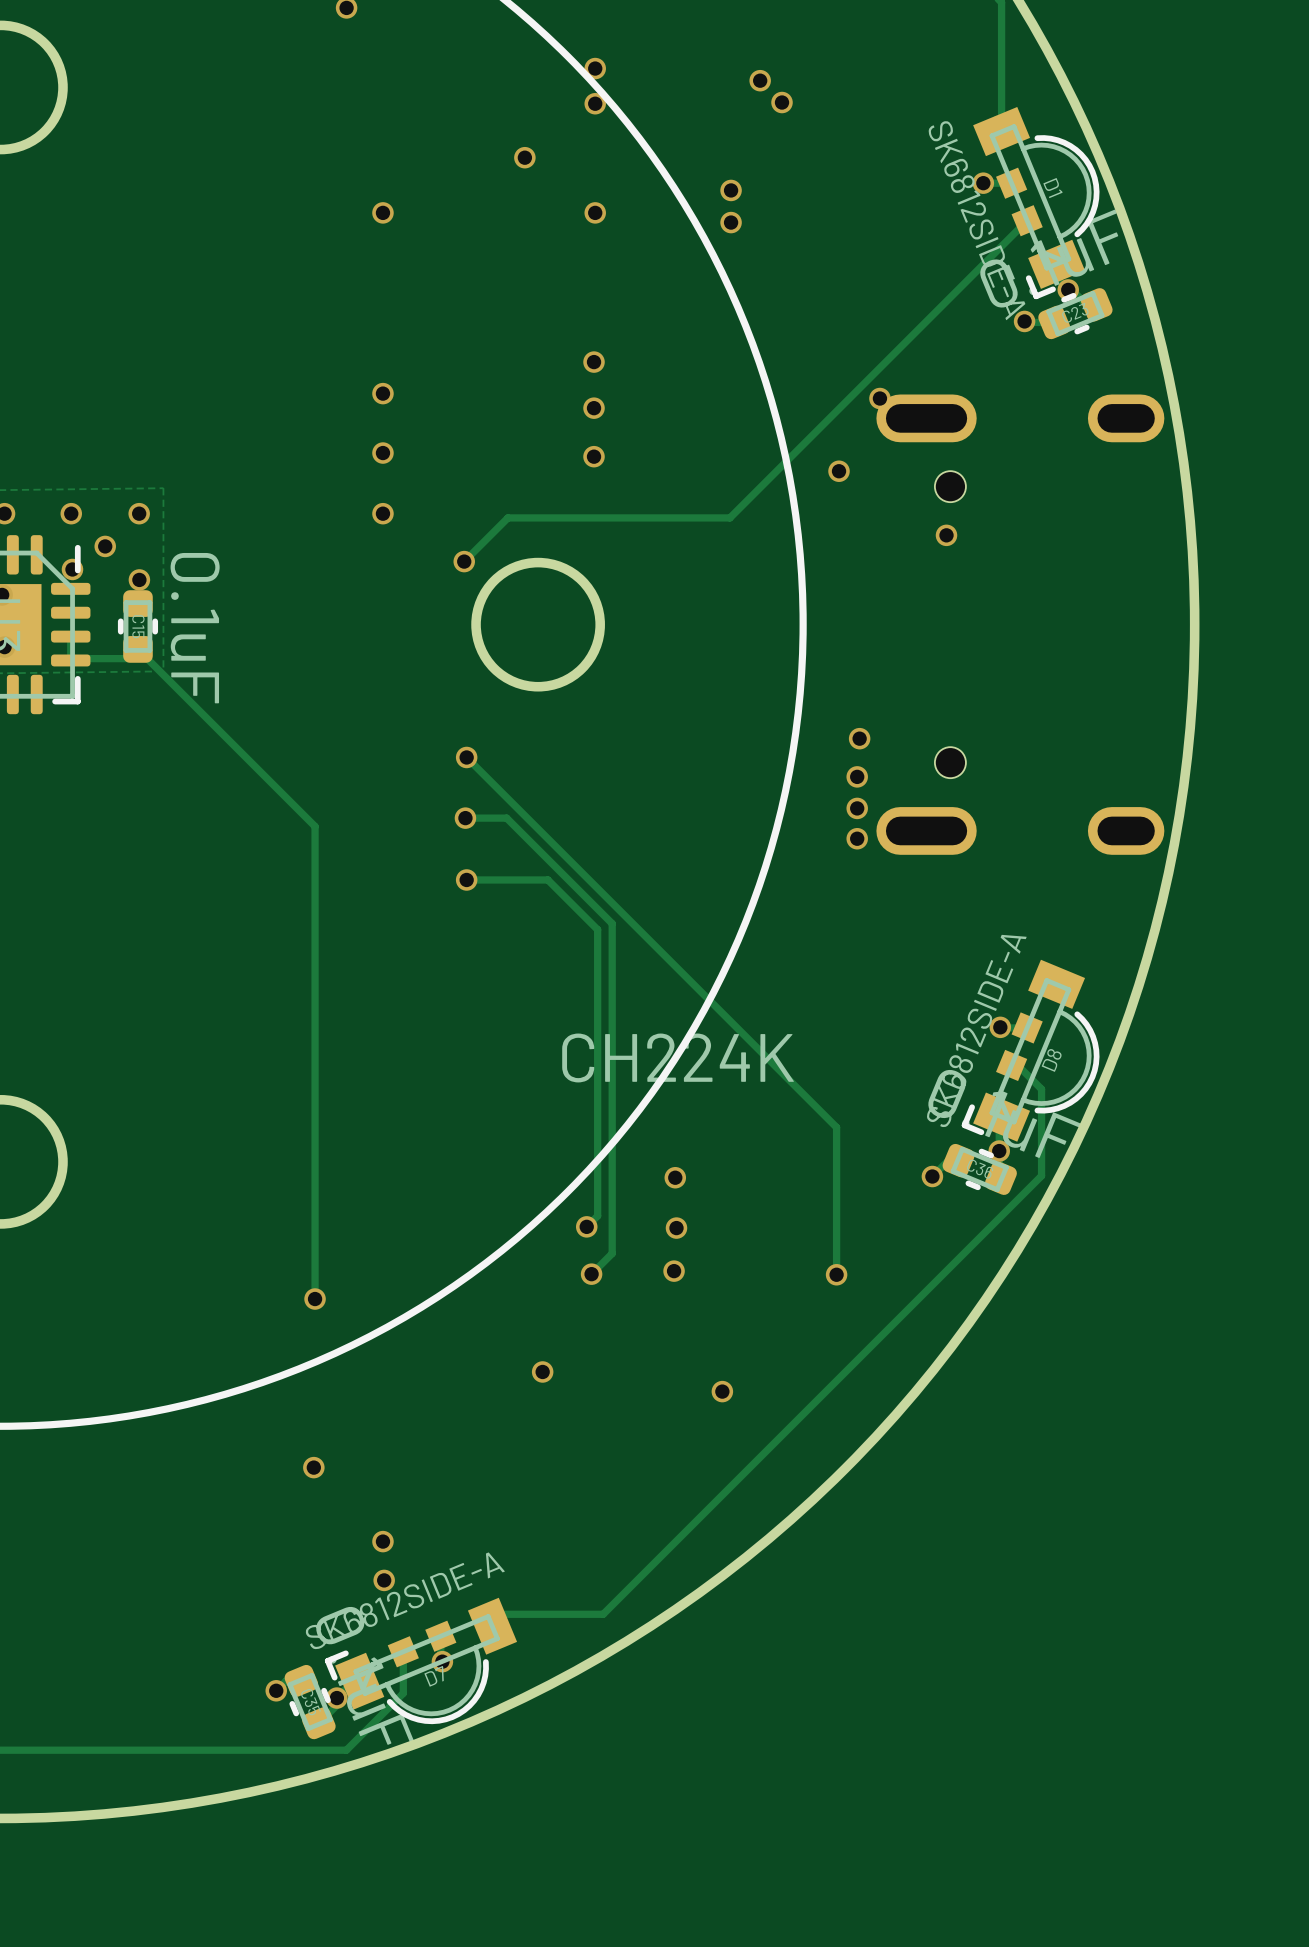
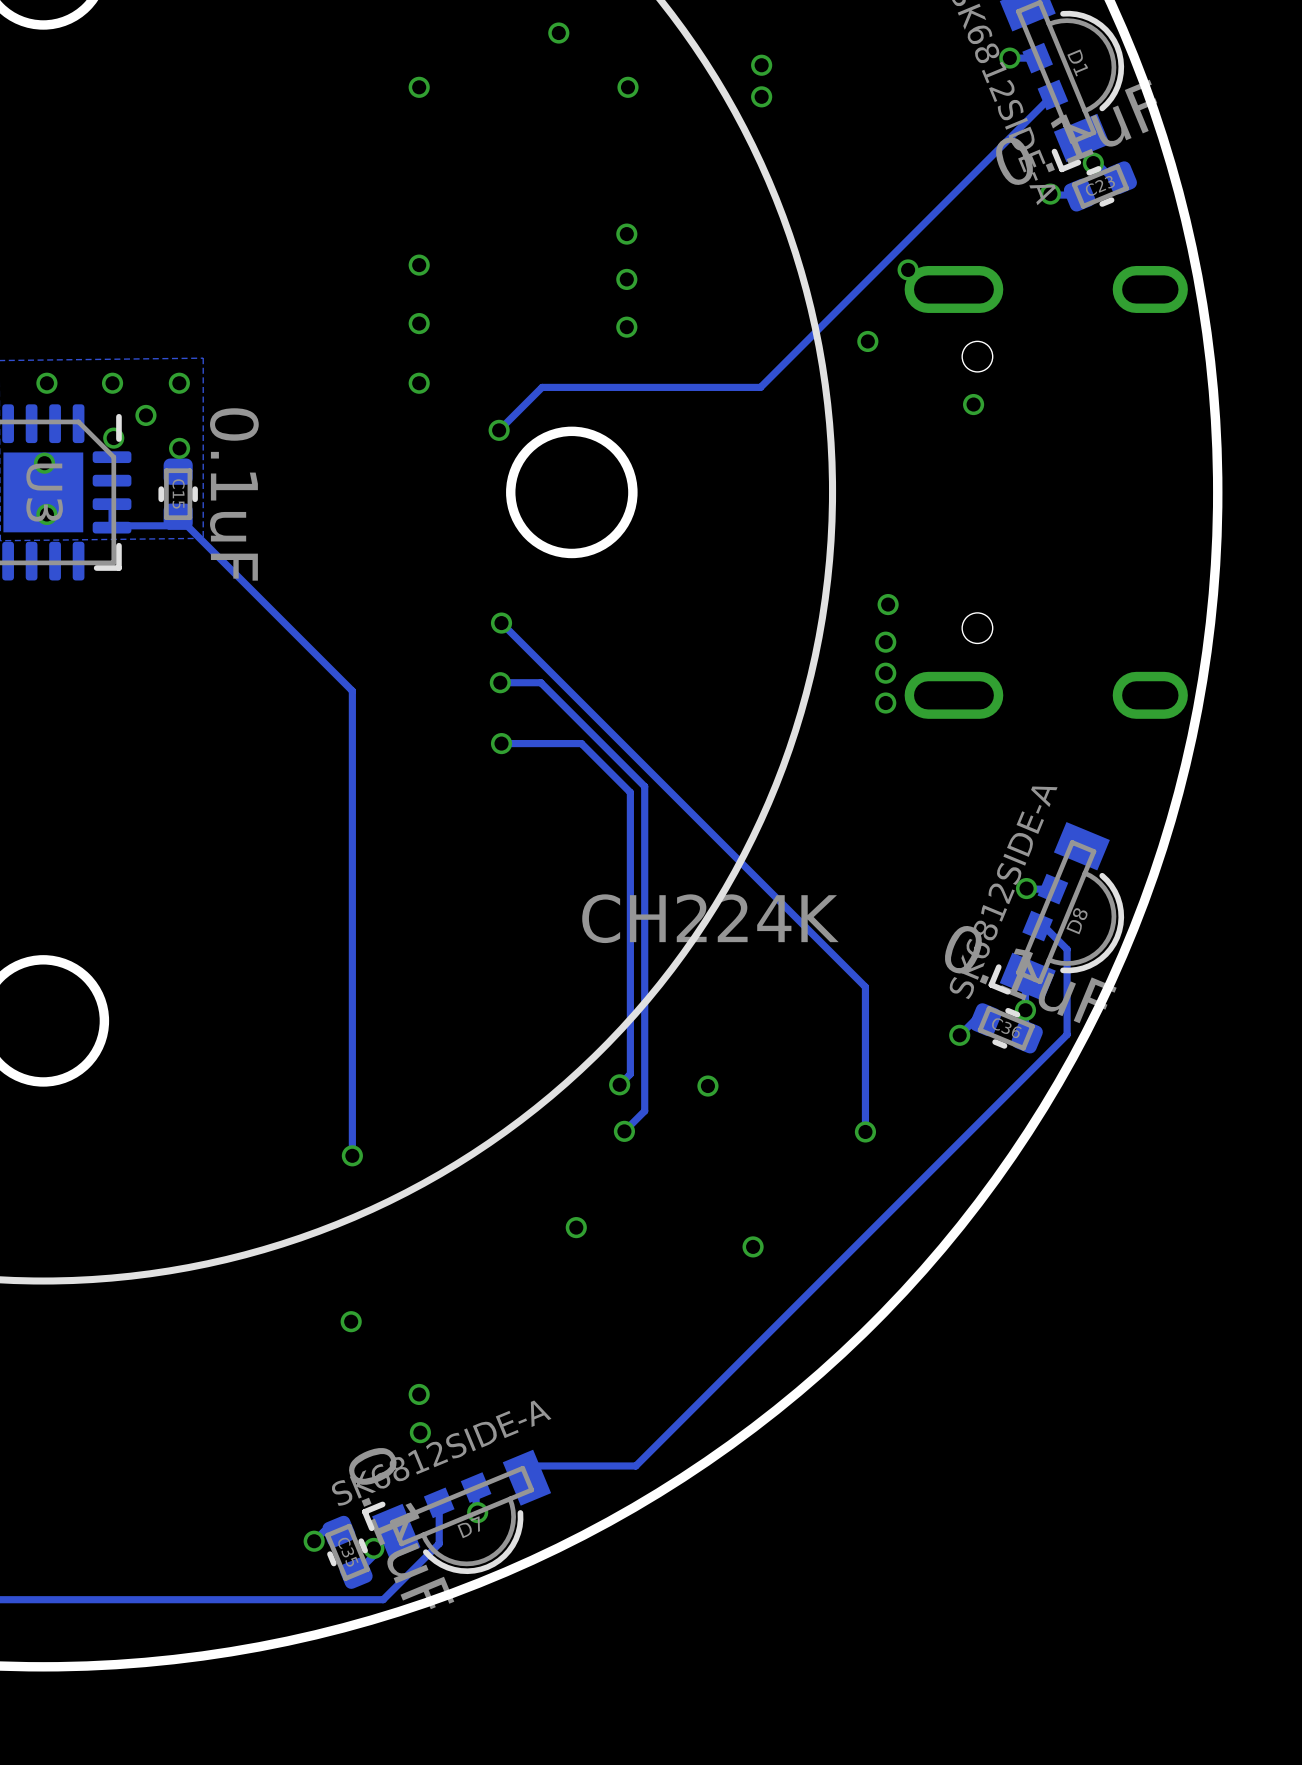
via: (675, 1177) -> none
via: (674, 1271) -> none

